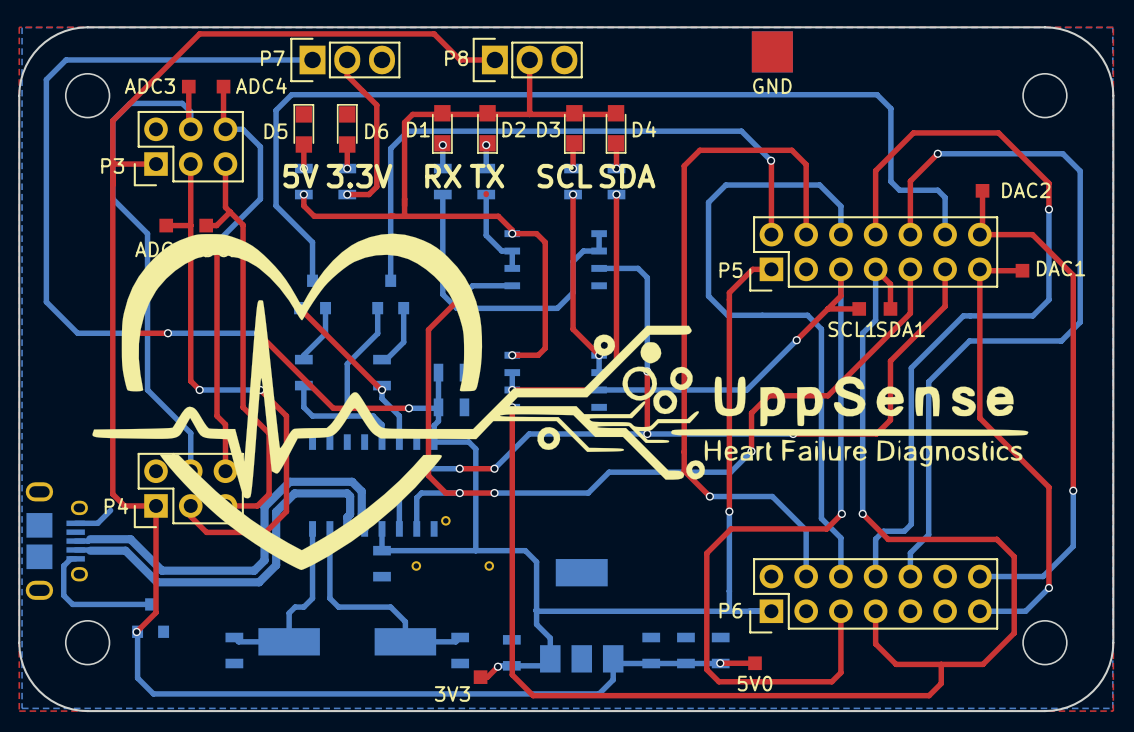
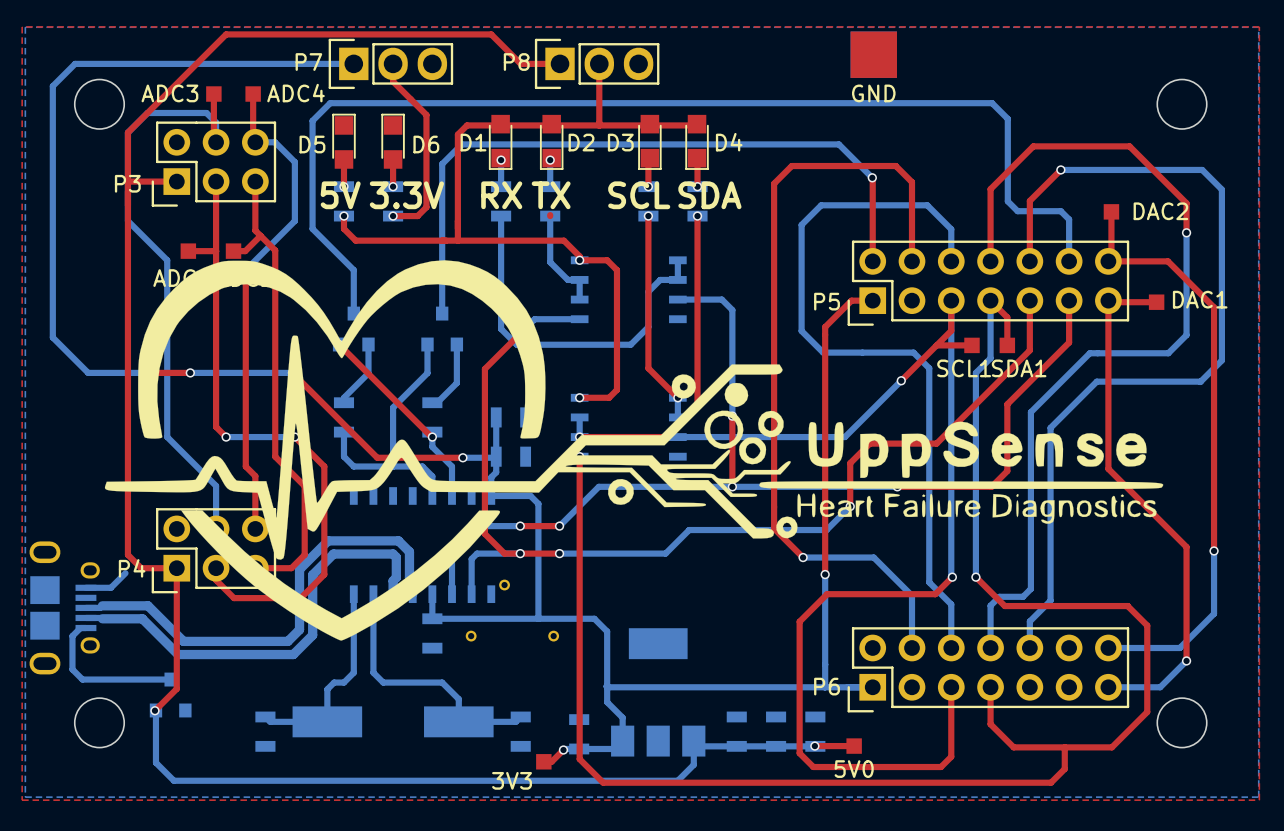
board edge: (87, 27) (1044, 27) (1060, 29) (1081, 37) (1093, 47) (1106, 66) (1111, 80) (1113, 95) (1113, 642) (1109, 665) (1102, 679) (1093, 691) (1081, 700) (1060, 709) (1044, 711) (87, 711) (72, 709) (51, 700) (39, 691) (29, 679) (20, 657) (19, 642) (19, 95) (23, 73) (29, 59) (39, 47) (51, 37) (65, 31) (87, 27) -> none

